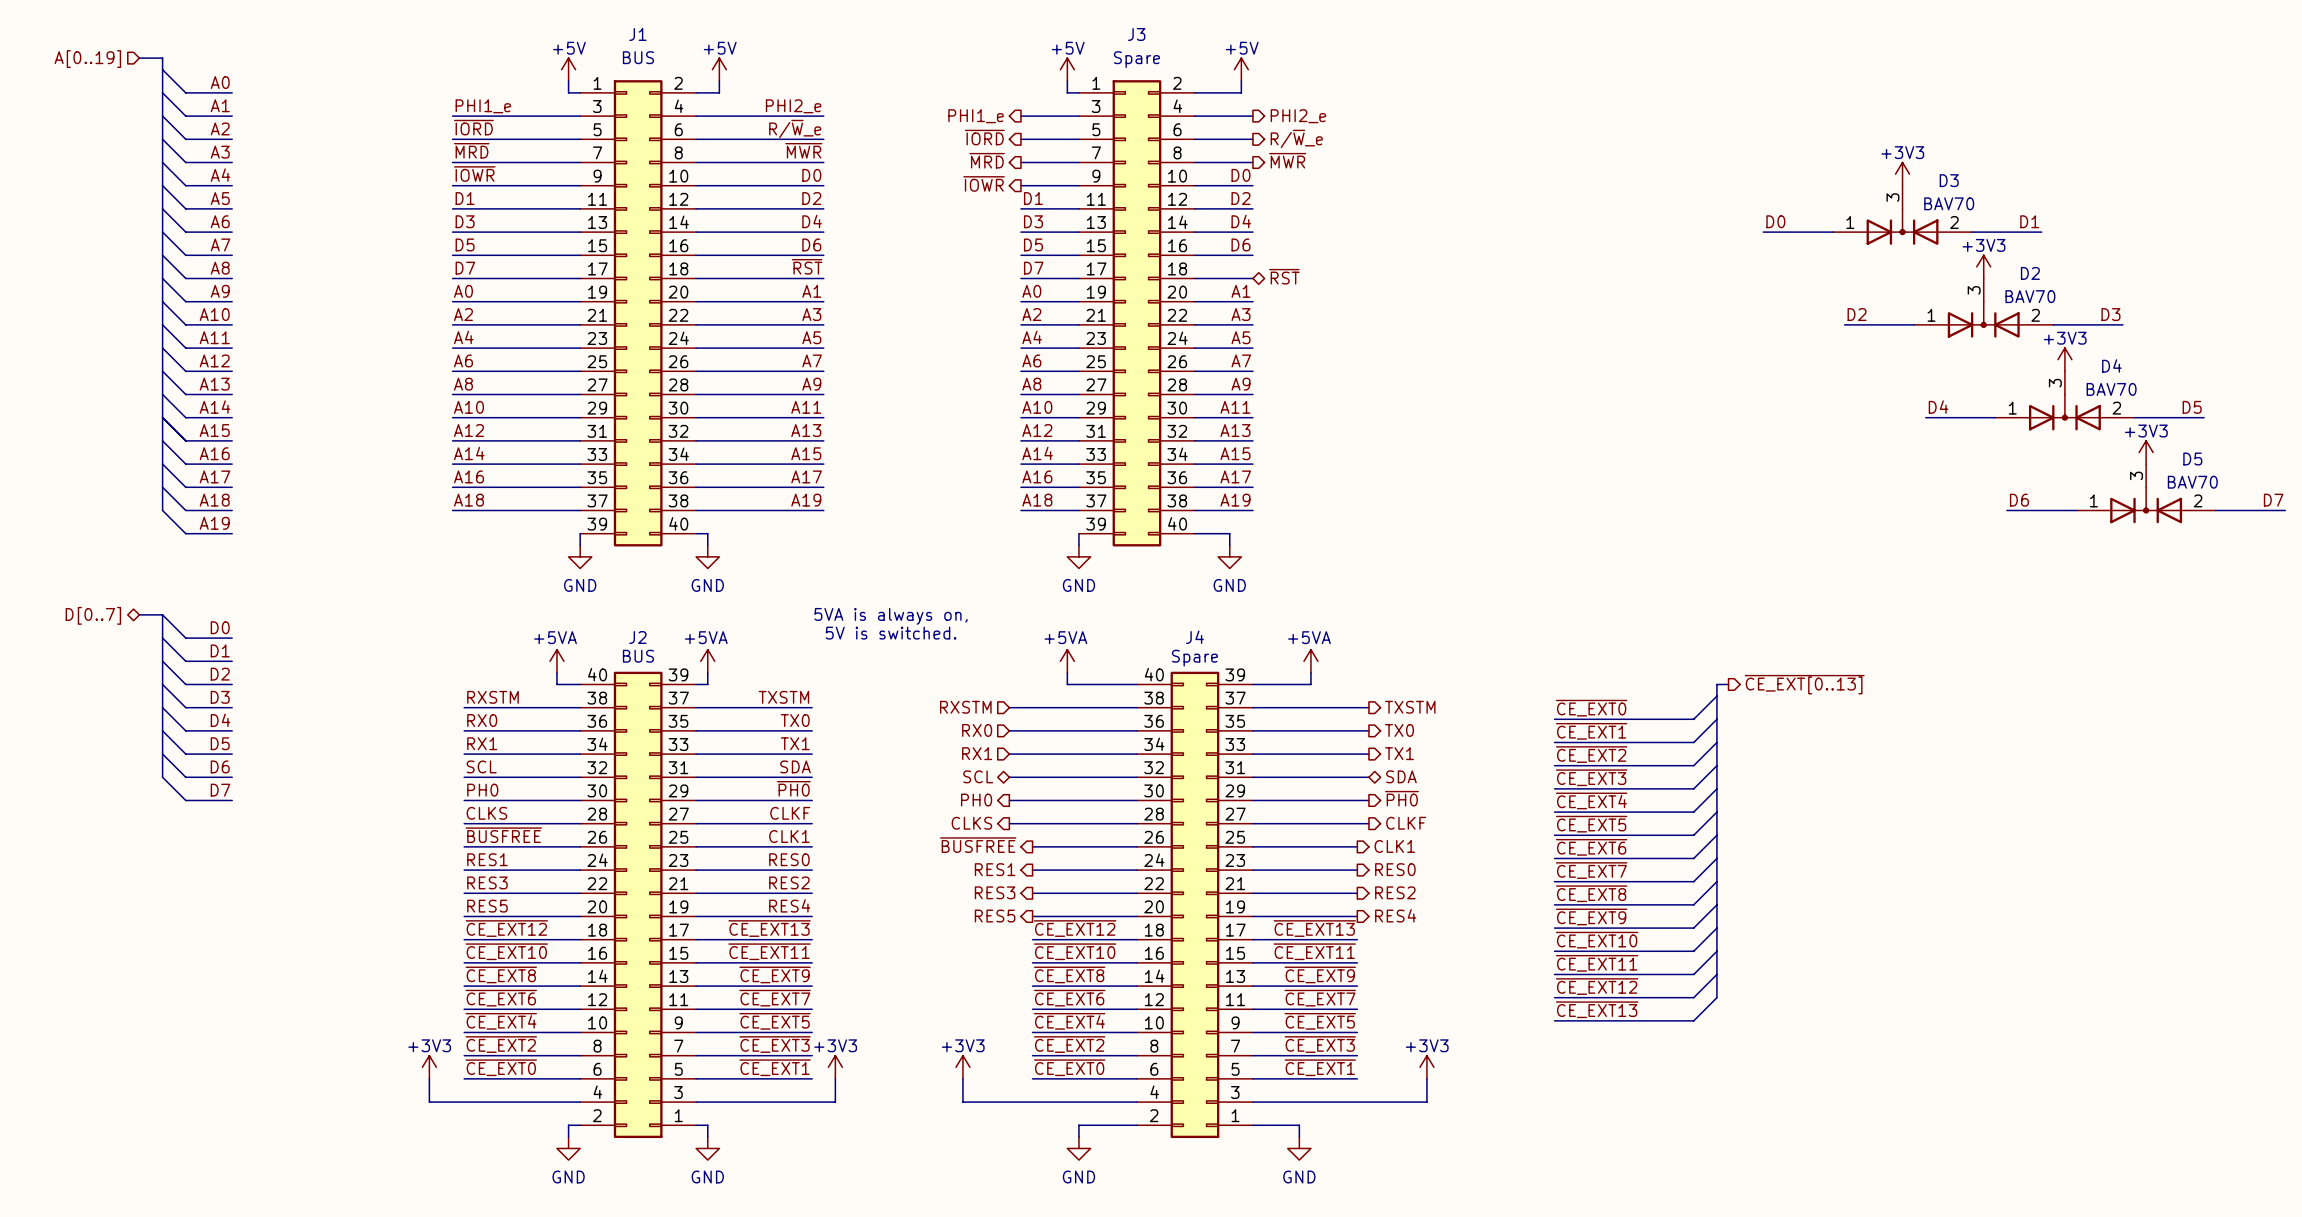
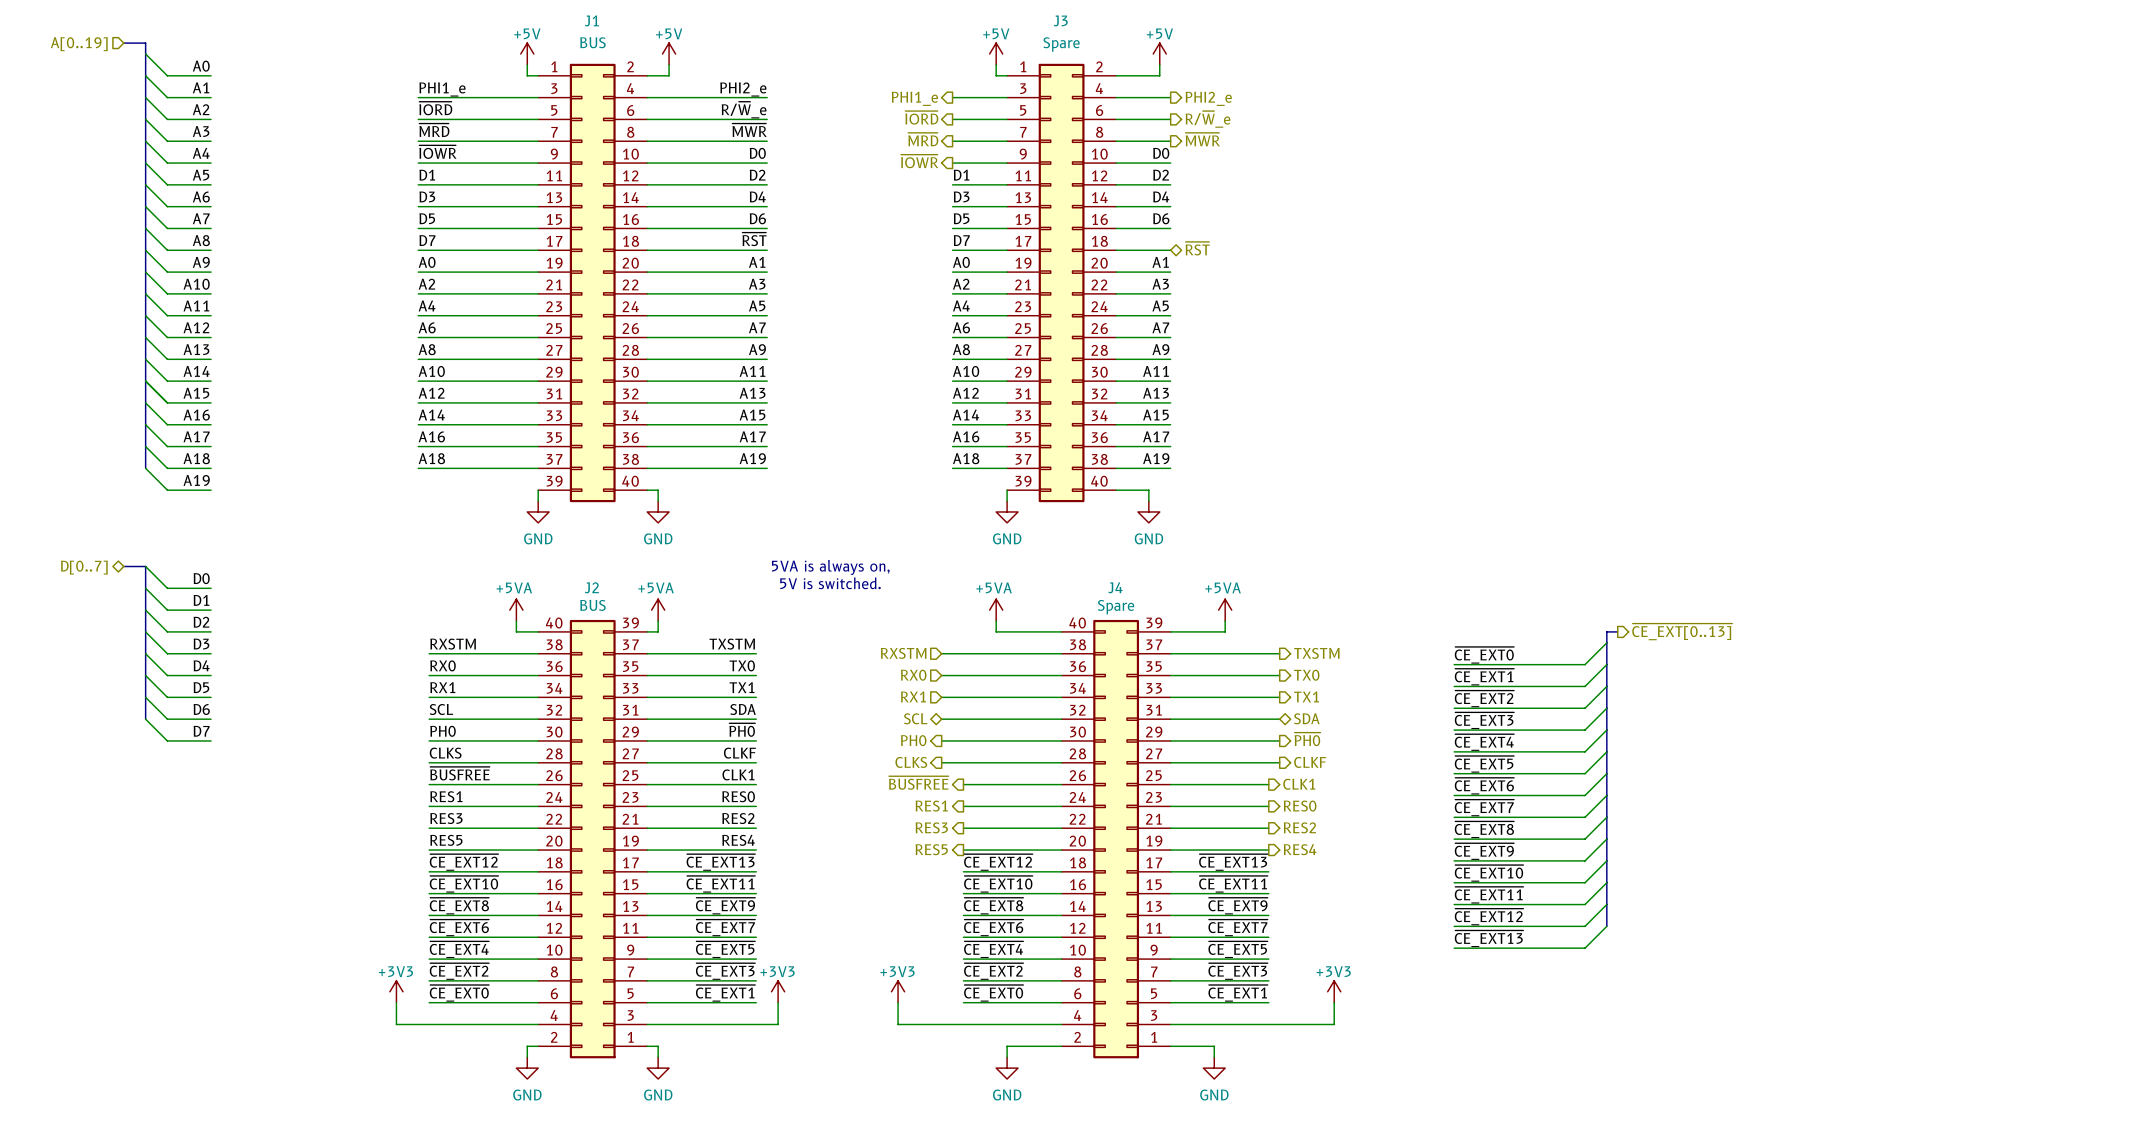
power symbol: +3V3 (1902, 174) -> none
D3: BAV70 (1902, 215) -> none
label: D0 (1775, 221) -> none
label: D1 (2029, 221) -> none
wire: (1763, 232) (1832, 232) -> none
wire: (1972, 232) (2041, 232) -> none
power symbol: +3V3 (1983, 266) -> none
D2: BAV70 (1983, 308) -> none
label: D2 (1857, 314) -> none
label: D3 (2110, 314) -> none
wire: (1844, 324) (1914, 324) -> none
wire: (2053, 324) (2122, 324) -> none
power symbol: +3V3 (2064, 359) -> none
D4: BAV70 (2064, 400) -> none
label: D4 (1938, 407) -> none
label: D5 (2192, 407) -> none
wire: (1925, 417) (1995, 417) -> none
wire: (2134, 417) (2204, 417) -> none
power symbol: +3V3 (2146, 452) -> none
D5: BAV70 (2146, 493) -> none
label: D6 (2019, 500) -> none
label: D7 (2273, 500) -> none
wire: (2006, 510) (2076, 510) -> none
wire: (2215, 510) (2285, 510) -> none

